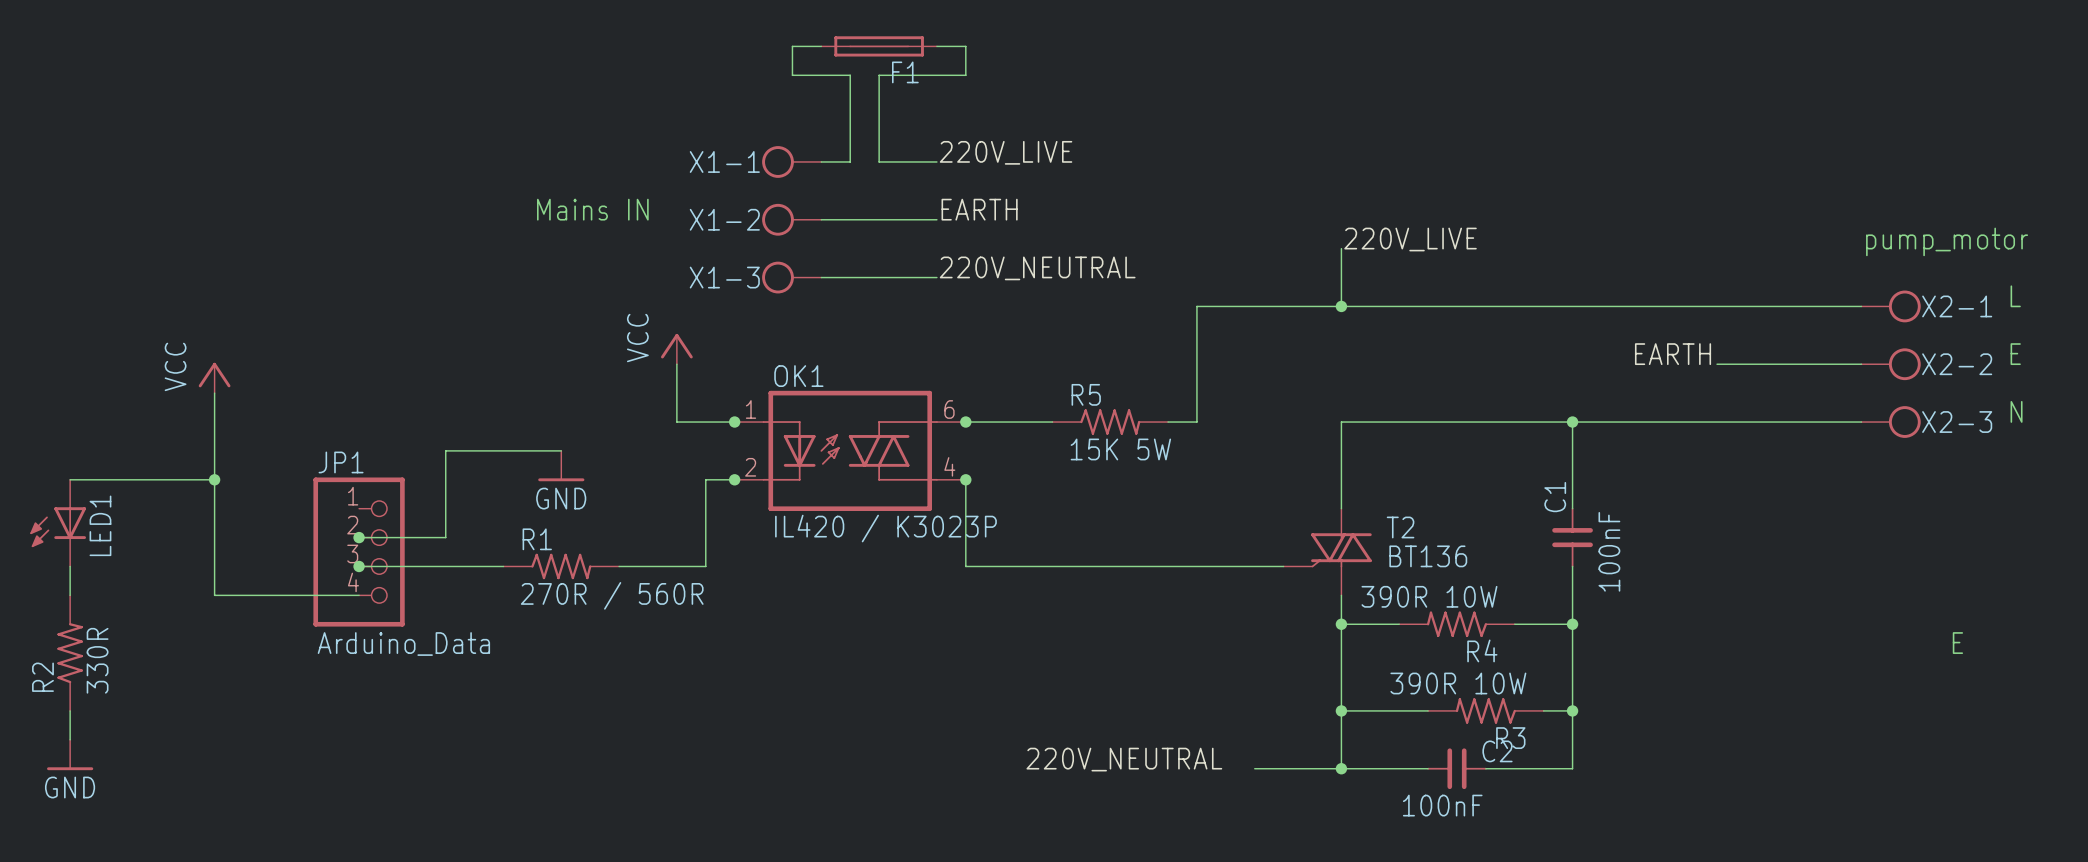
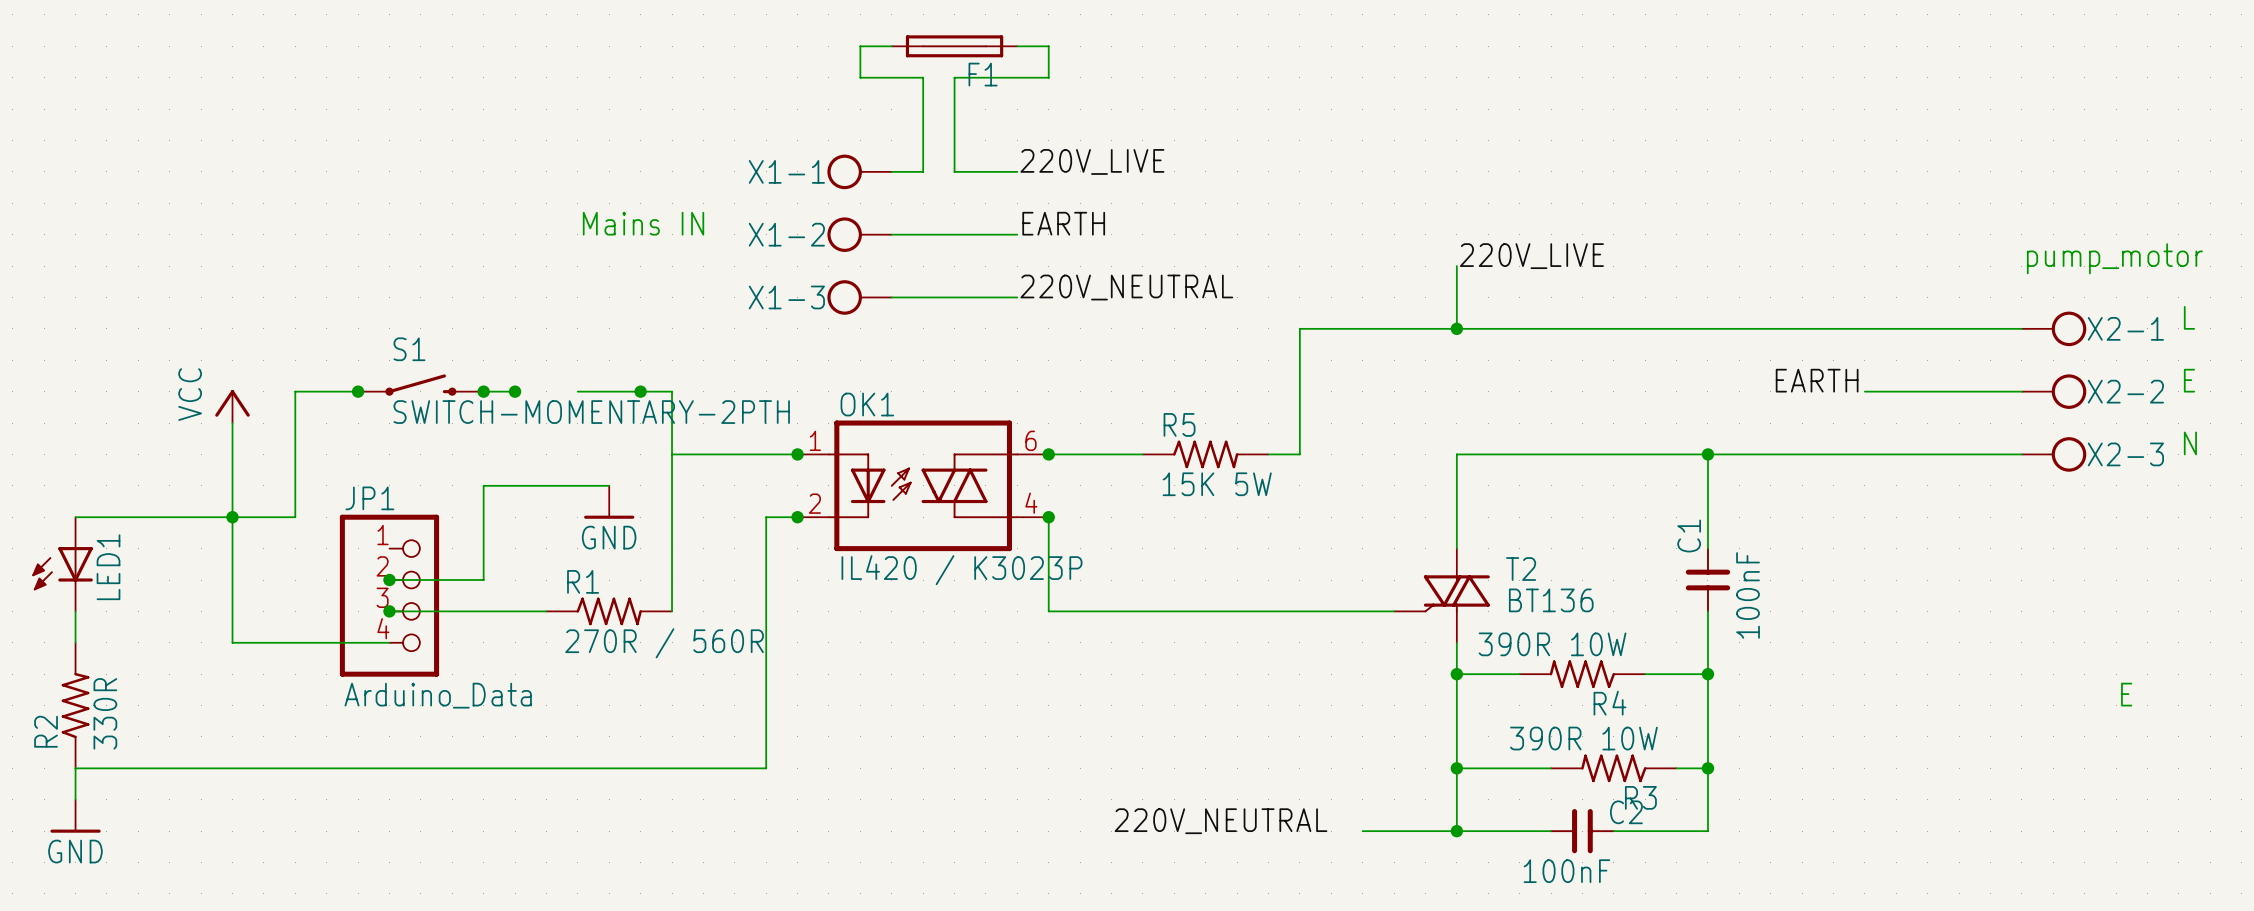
power symbol: VCC (676, 349) -> none
S1: none -> SWITCH-MOMENTARY-2PTH (420, 385)
wire: none -> (358, 391) (295, 391) (295, 517) (232, 517)
junction: none -> (358, 391)
wire: none -> (483, 391) (515, 391)
junction: none -> (483, 391)
junction: none -> (515, 391)
junction: none -> (640, 391)
wire: (676, 364) (676, 422) -> (672, 454) (734, 454)
wire: (619, 566) (705, 566) -> (672, 611) (672, 391) (577, 391)
wire: none -> (766, 611) (766, 768) (75, 768)

